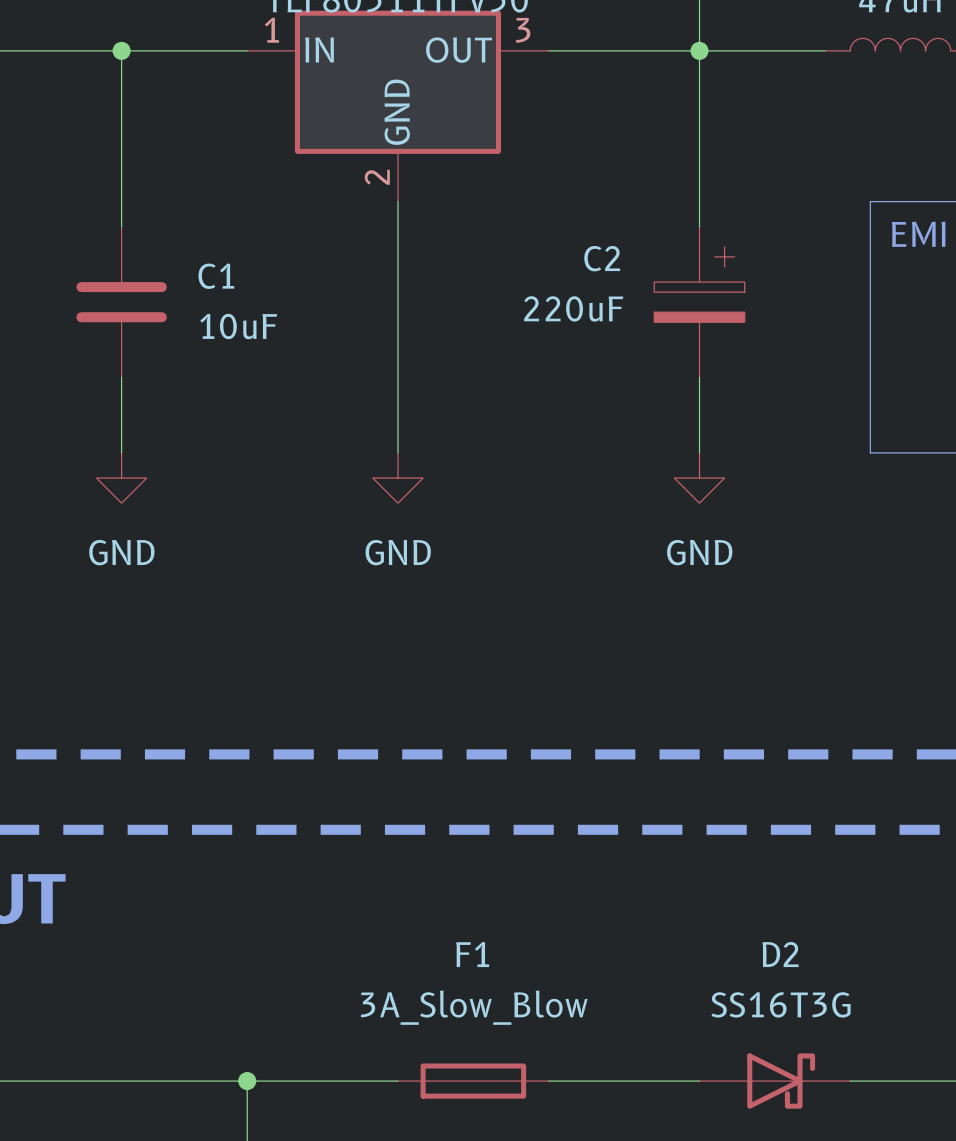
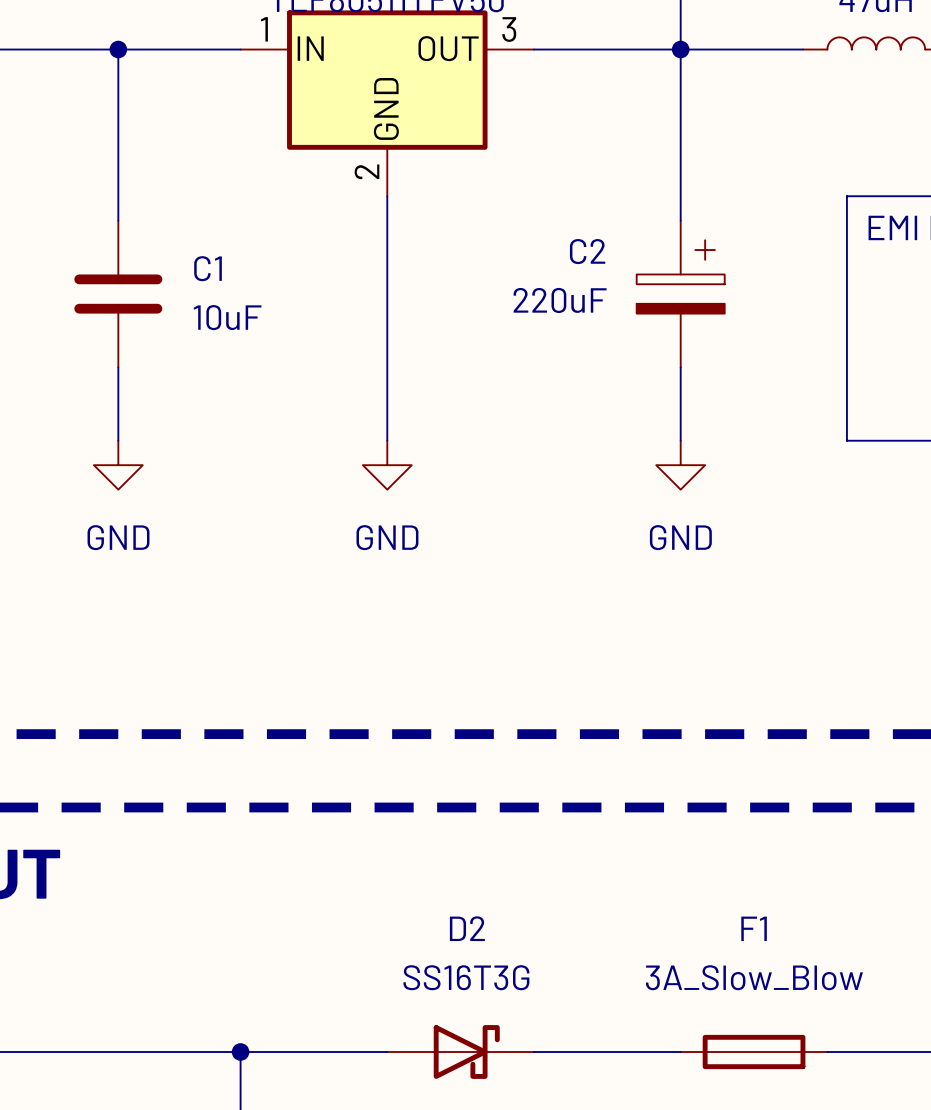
F1 position: (473, 1081) -> (754, 1051)
D2 position: (774, 1081) -> (460, 1051)

